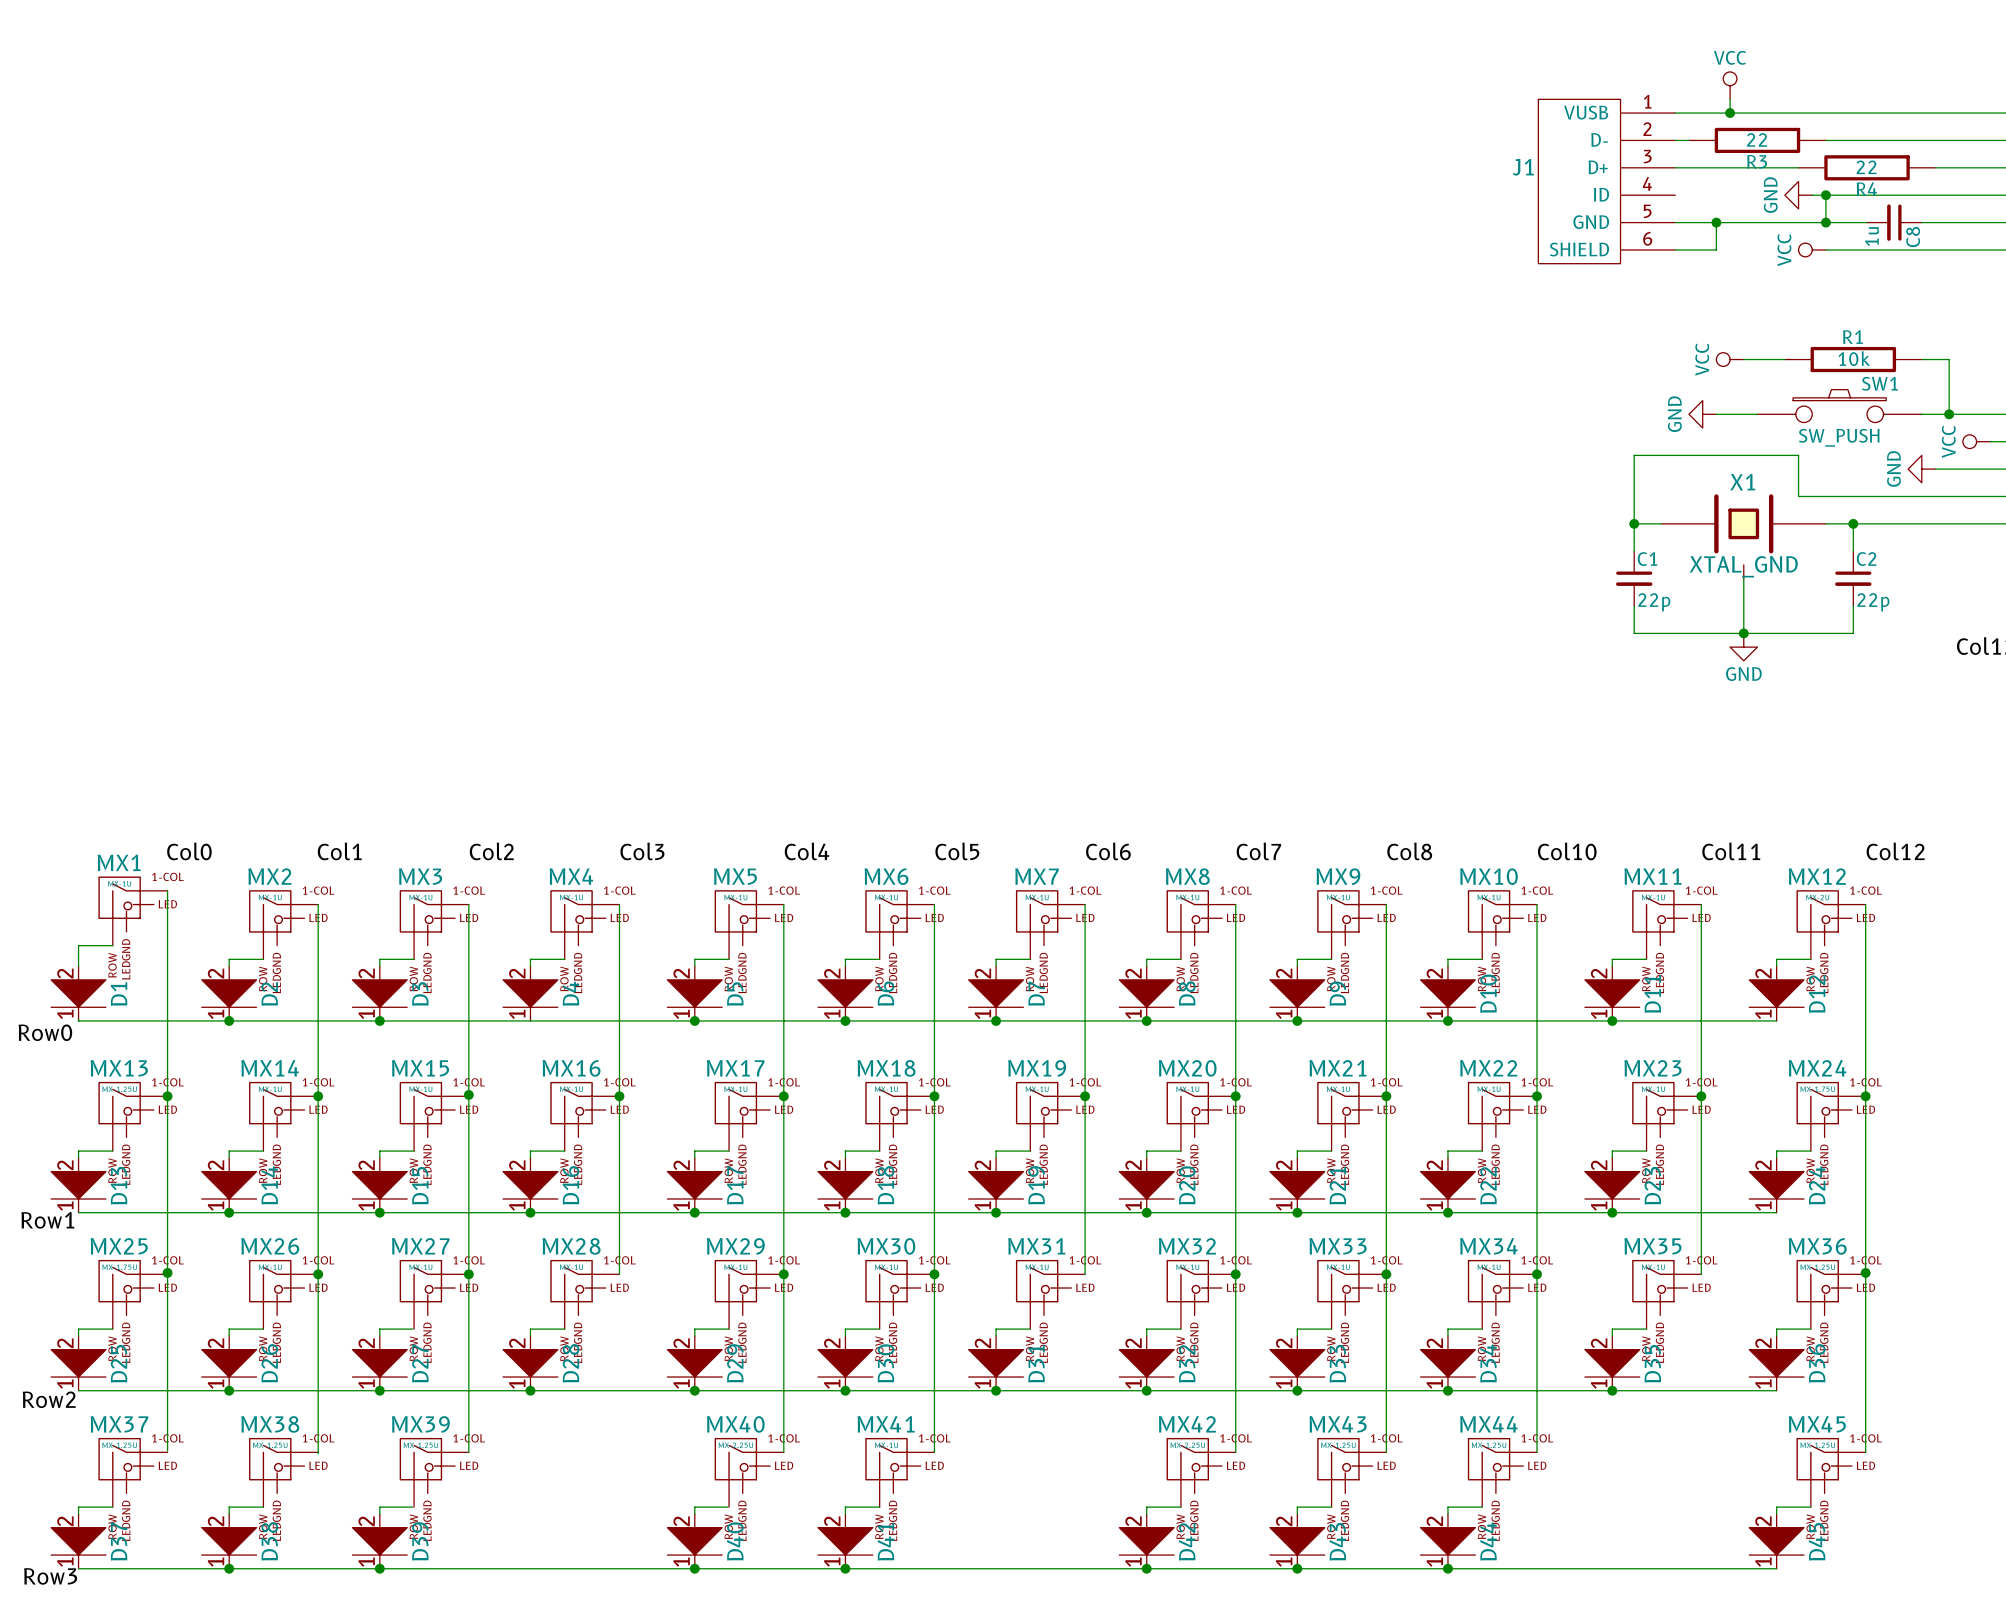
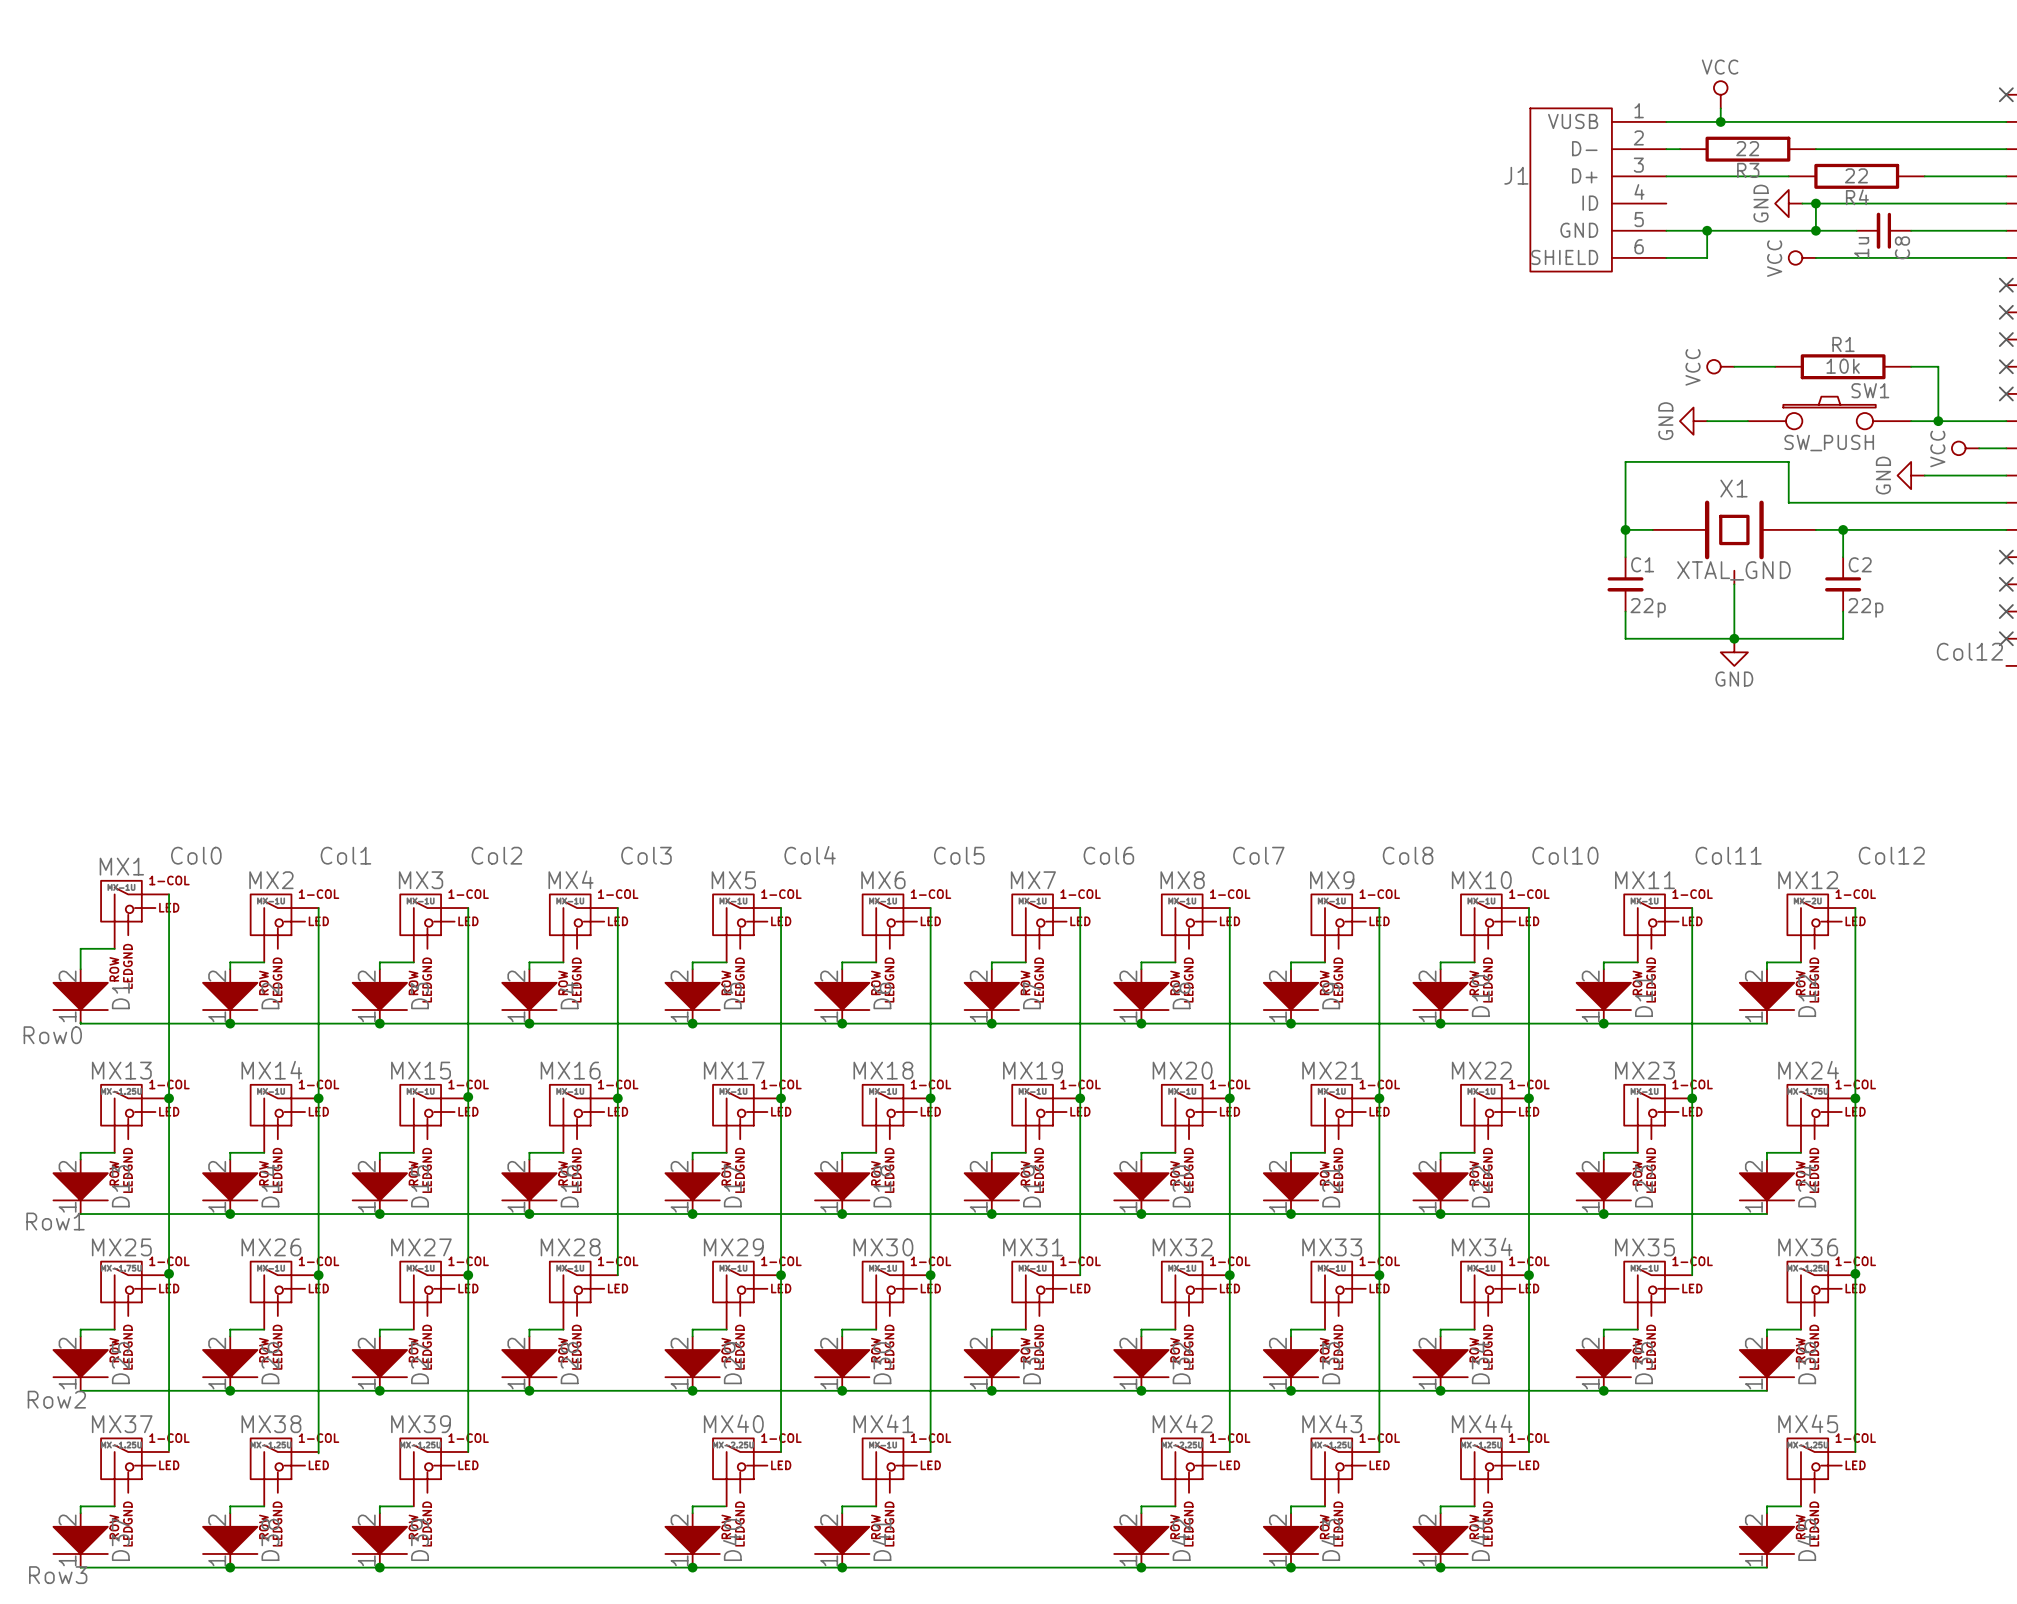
junction: none -> (529, 1023)

